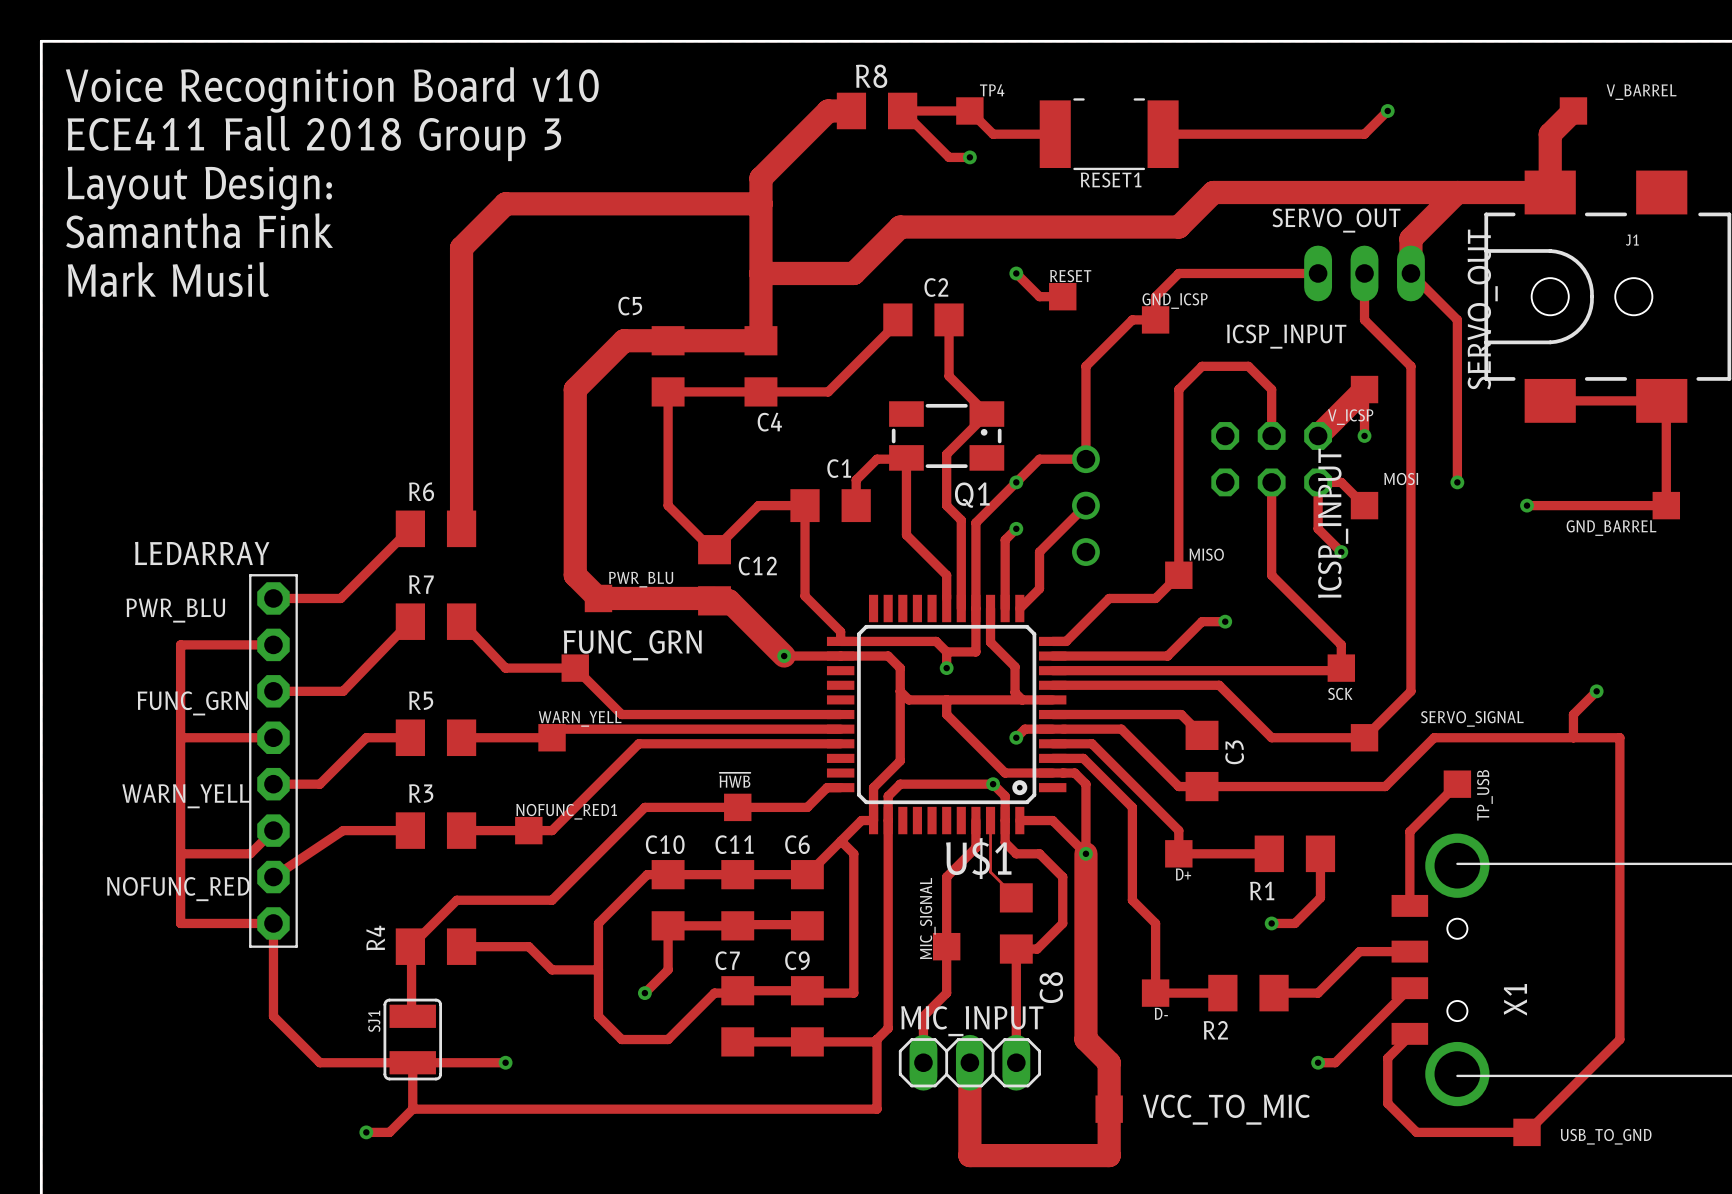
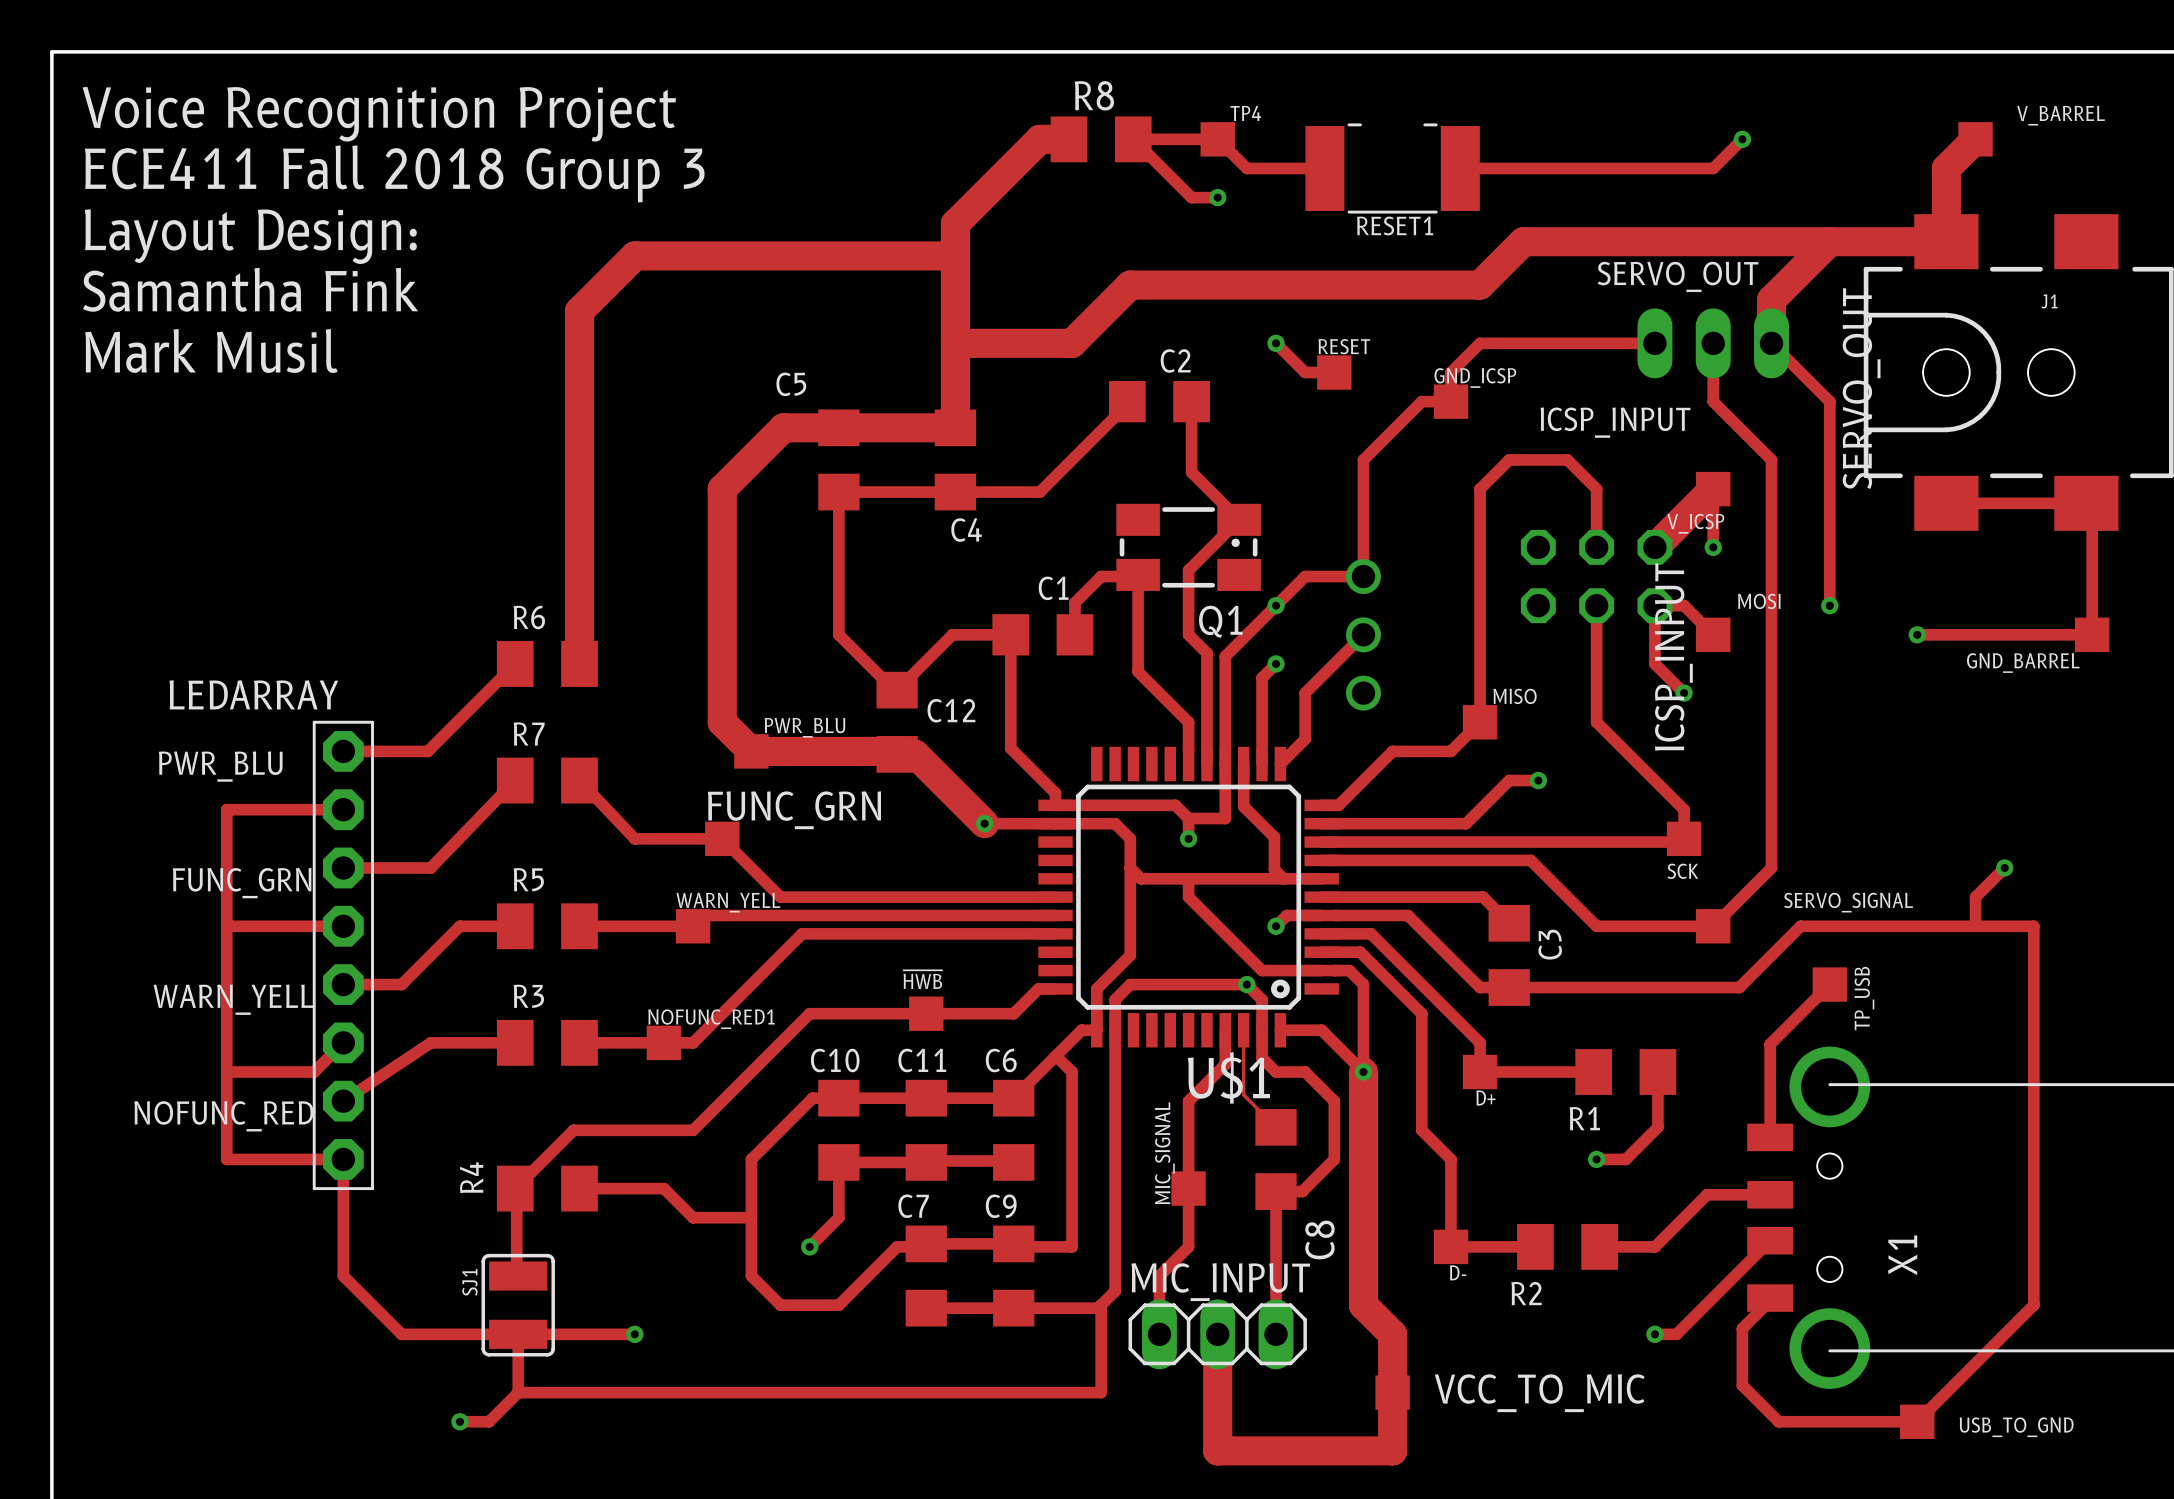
text: Voice Recognition Board v10 (332, 89) -> Voice Recognition Project (379, 114)

